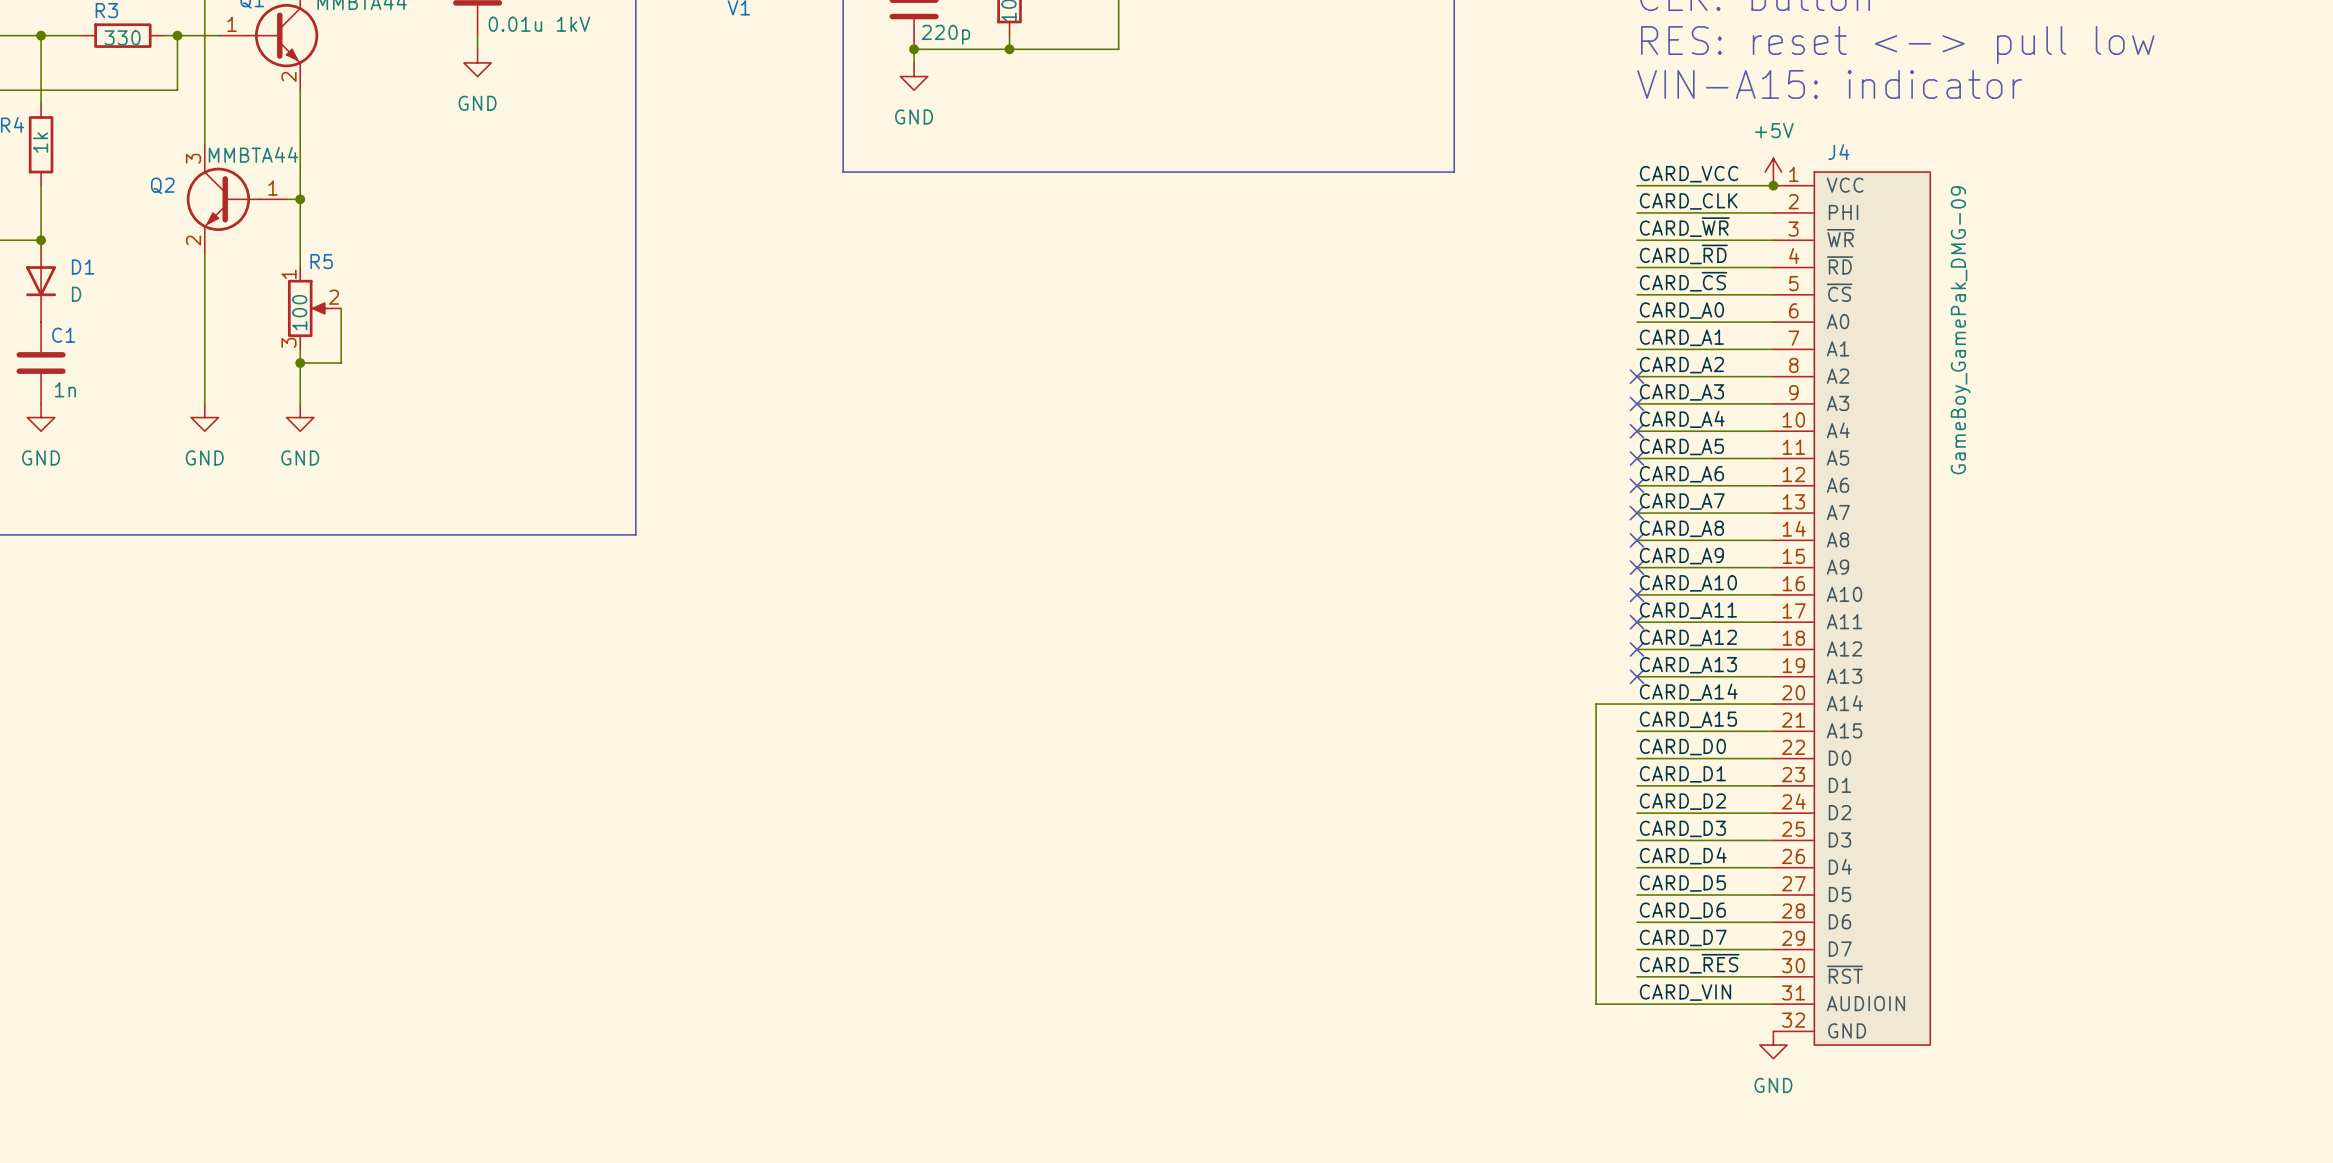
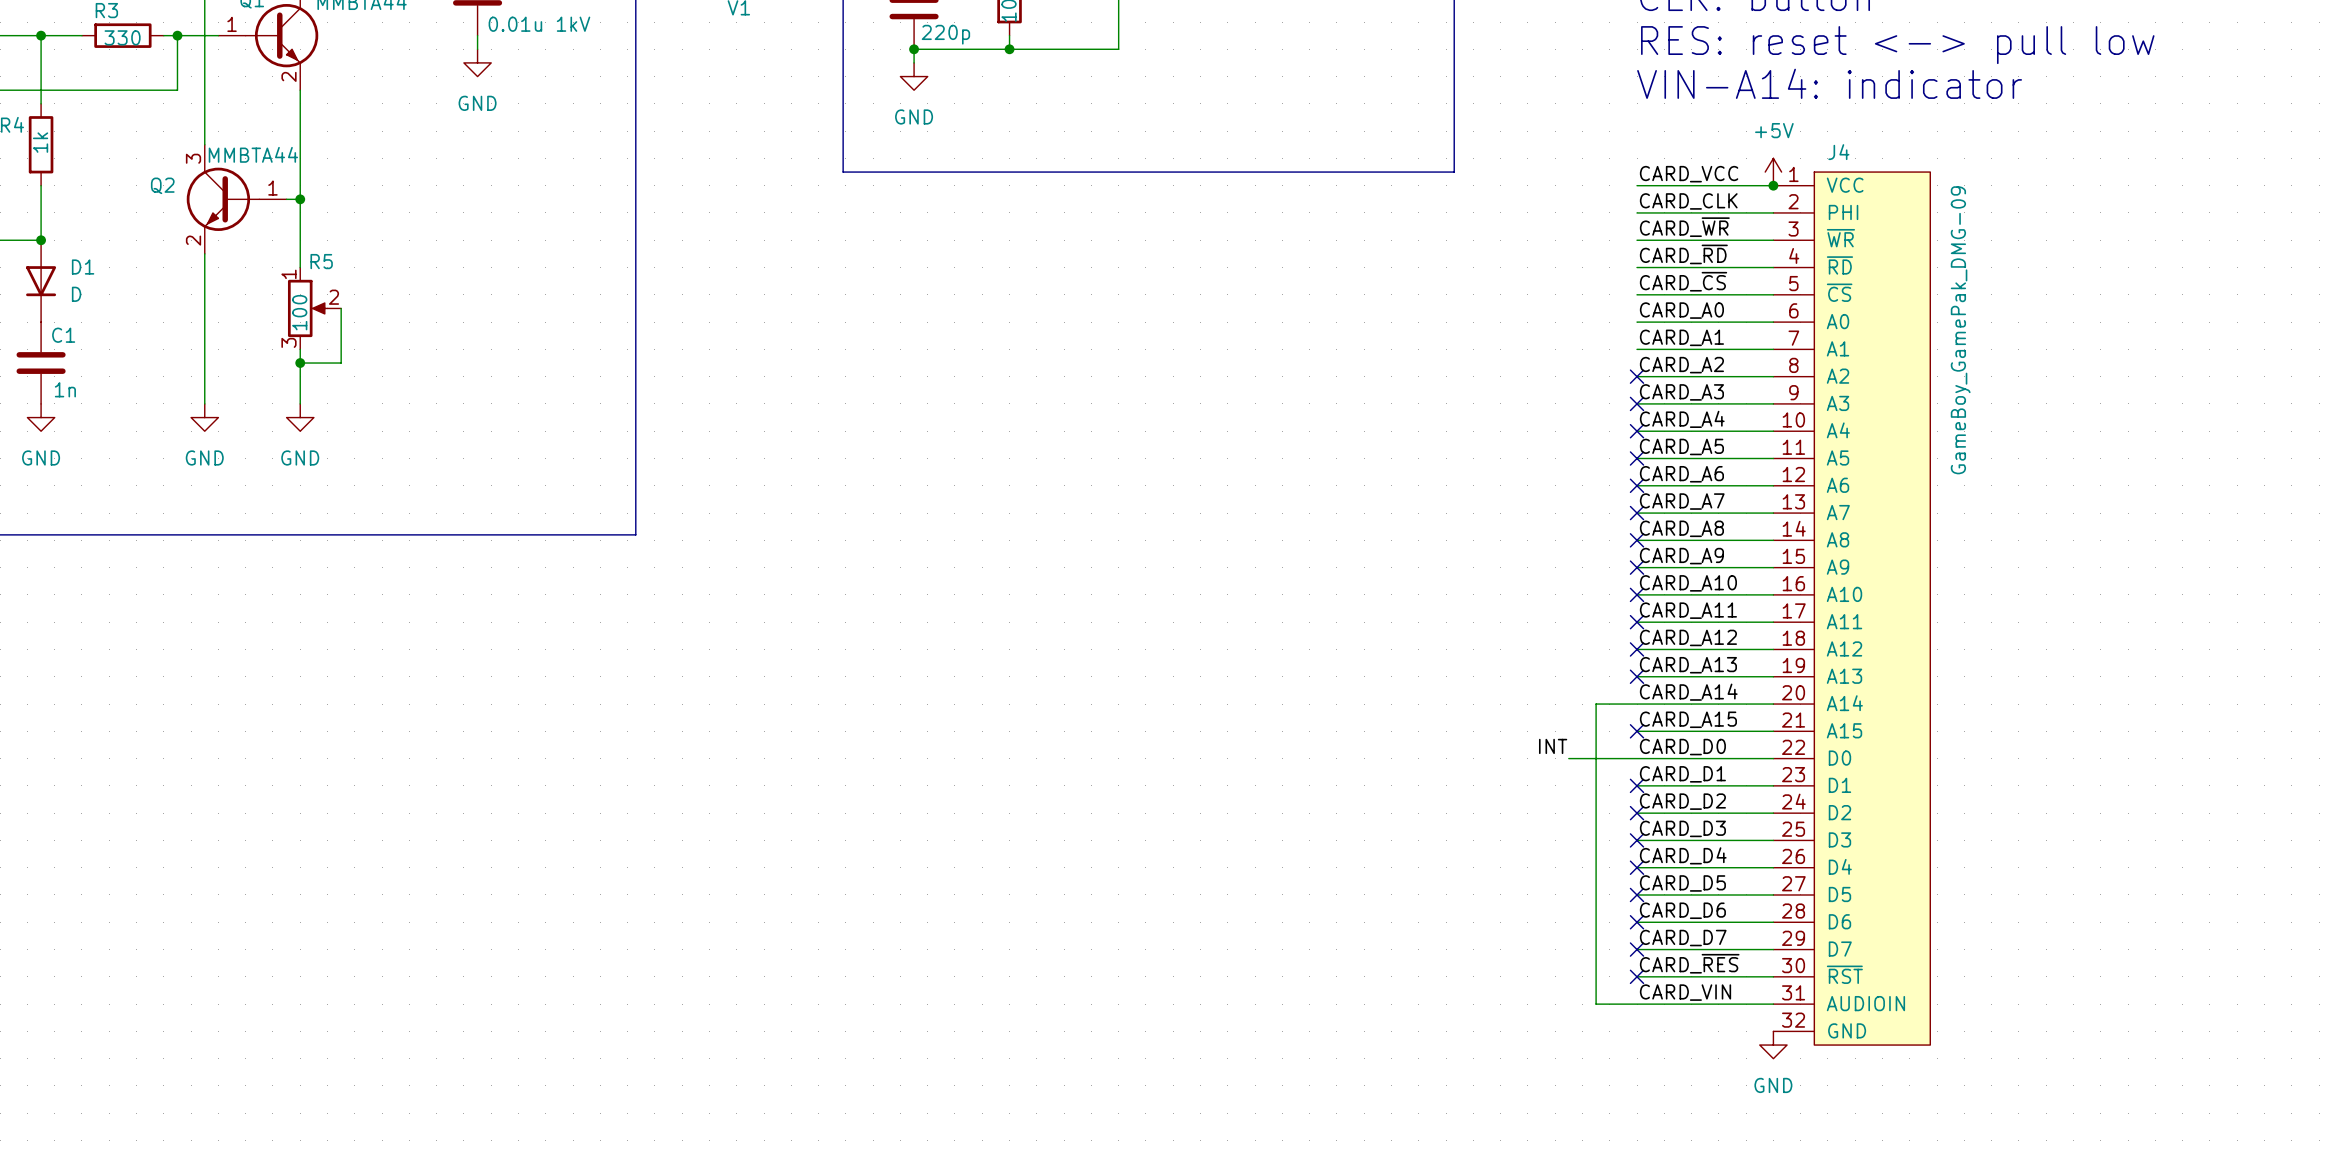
text: VIN-A15: indicator (1829, 84) -> VIN-A14: indicator (1829, 83)
no-connect mark: none -> (1637, 731)
label: none -> INT (1553, 746)
wire: none -> (1568, 758) (1637, 758)
no-connect mark: none -> (1637, 785)
no-connect mark: none -> (1637, 813)
no-connect mark: none -> (1637, 840)
no-connect mark: none -> (1637, 867)
no-connect mark: none -> (1637, 894)
no-connect mark: none -> (1637, 922)
no-connect mark: none -> (1637, 949)
no-connect mark: none -> (1637, 976)

